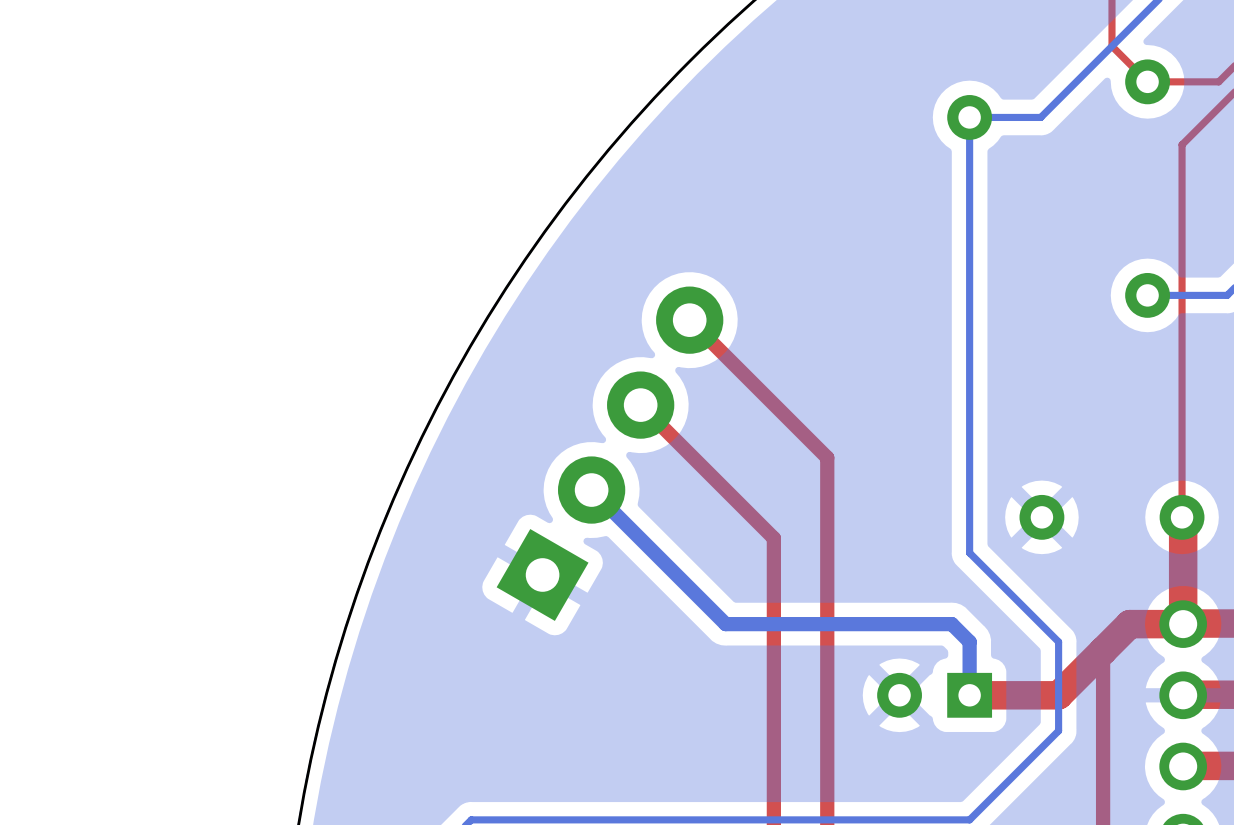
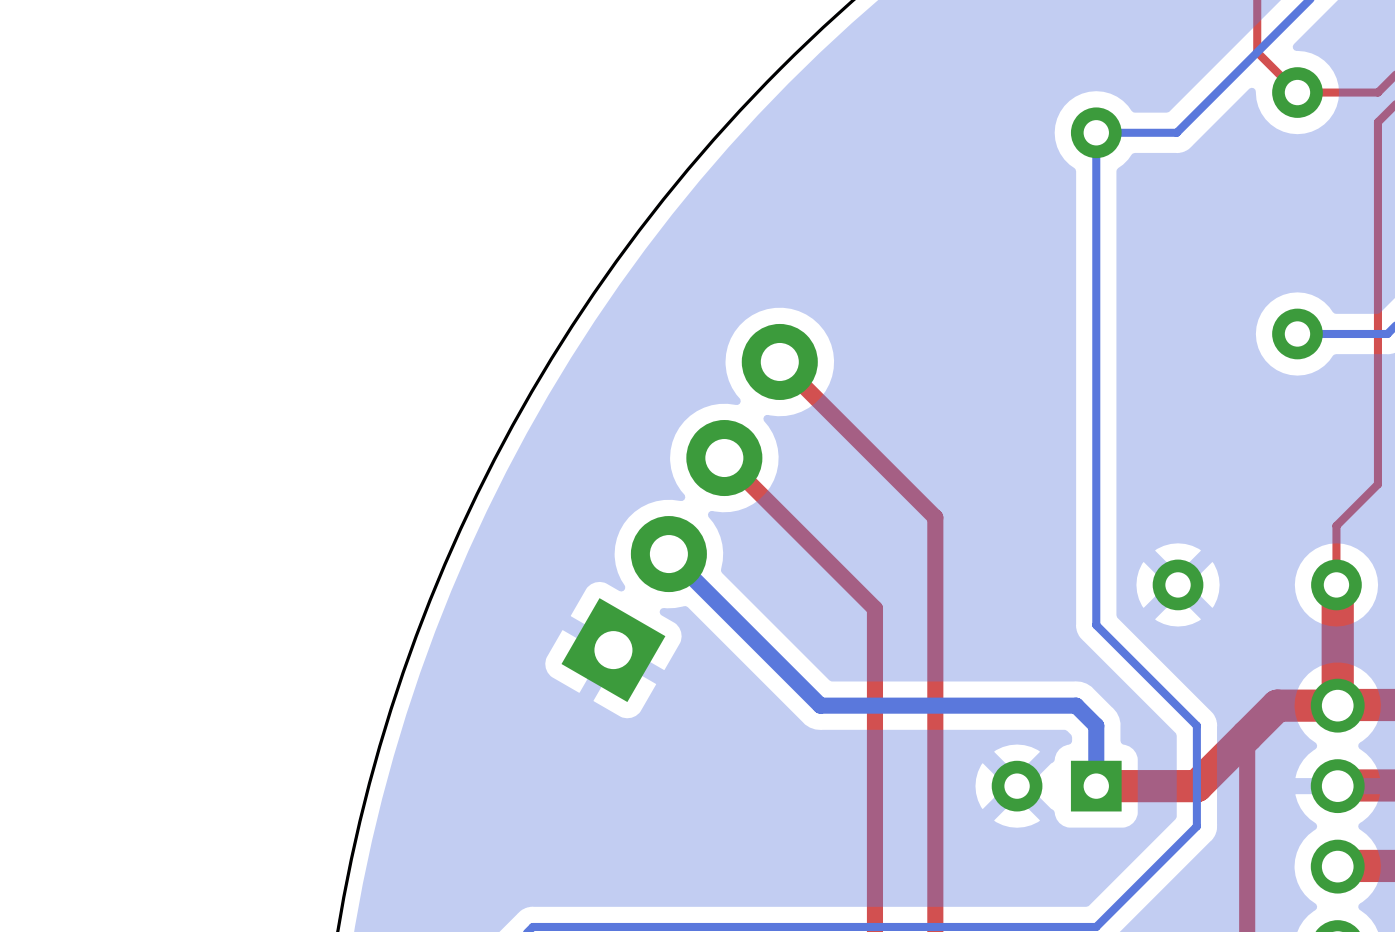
top track: (1218, 108) (1182, 144) (1182, 465) -> (1377, 122) (1377, 484) (1336, 525)

